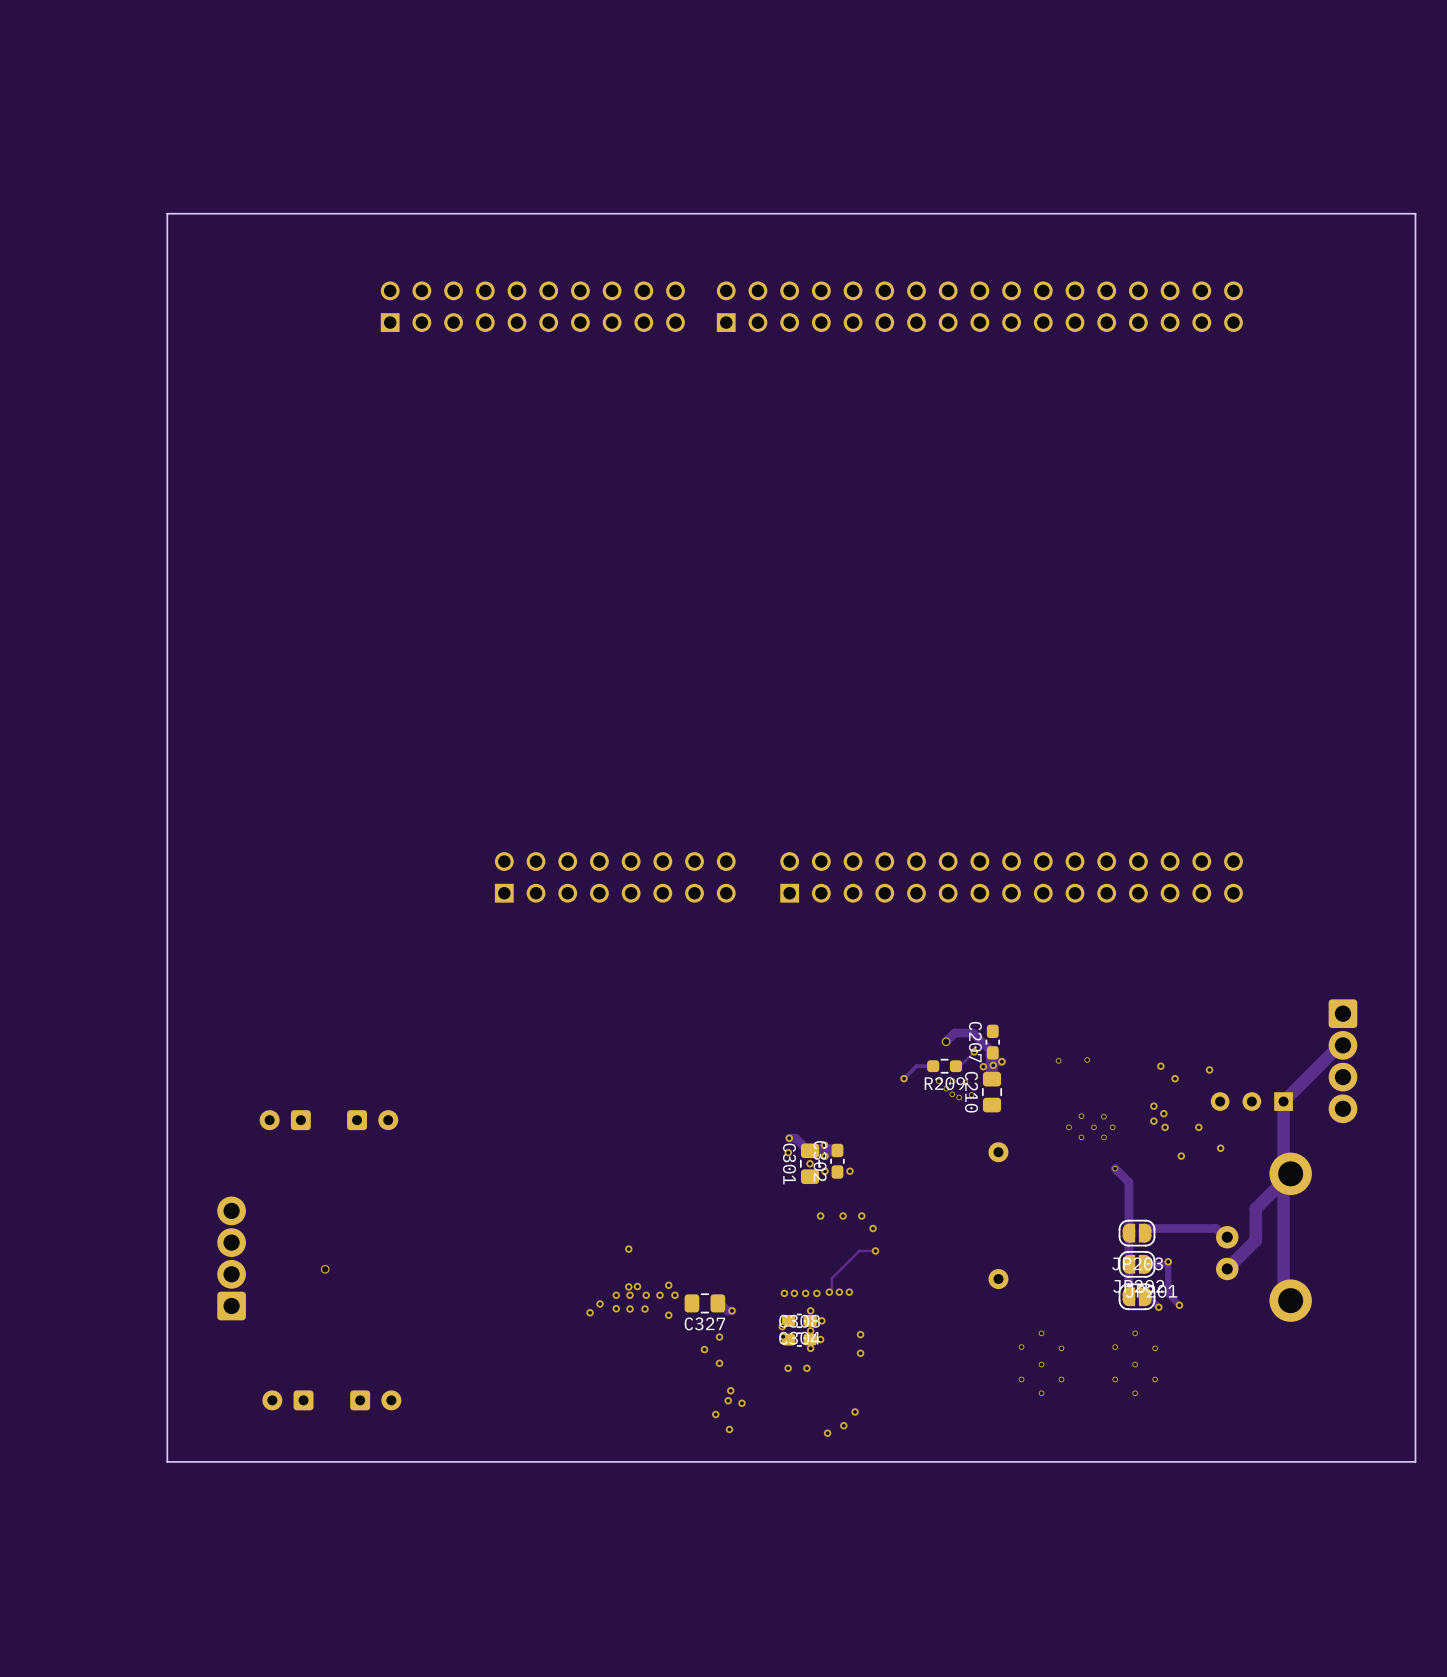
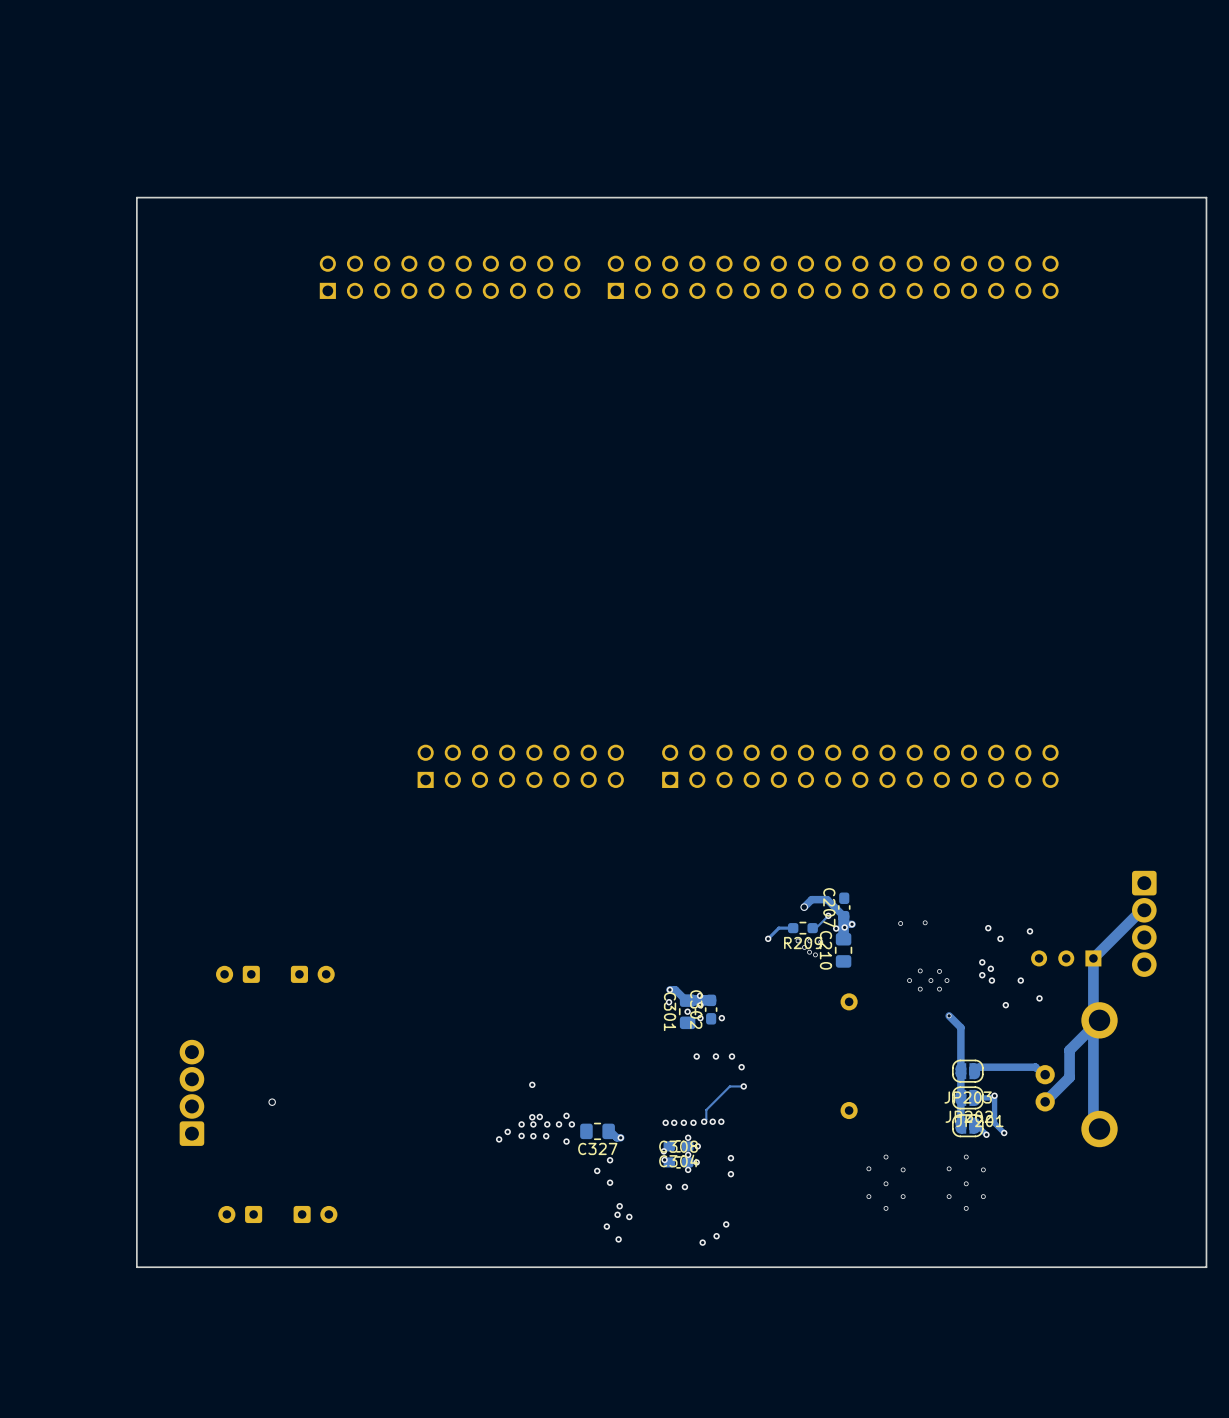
via: (971, 1094) -> none

